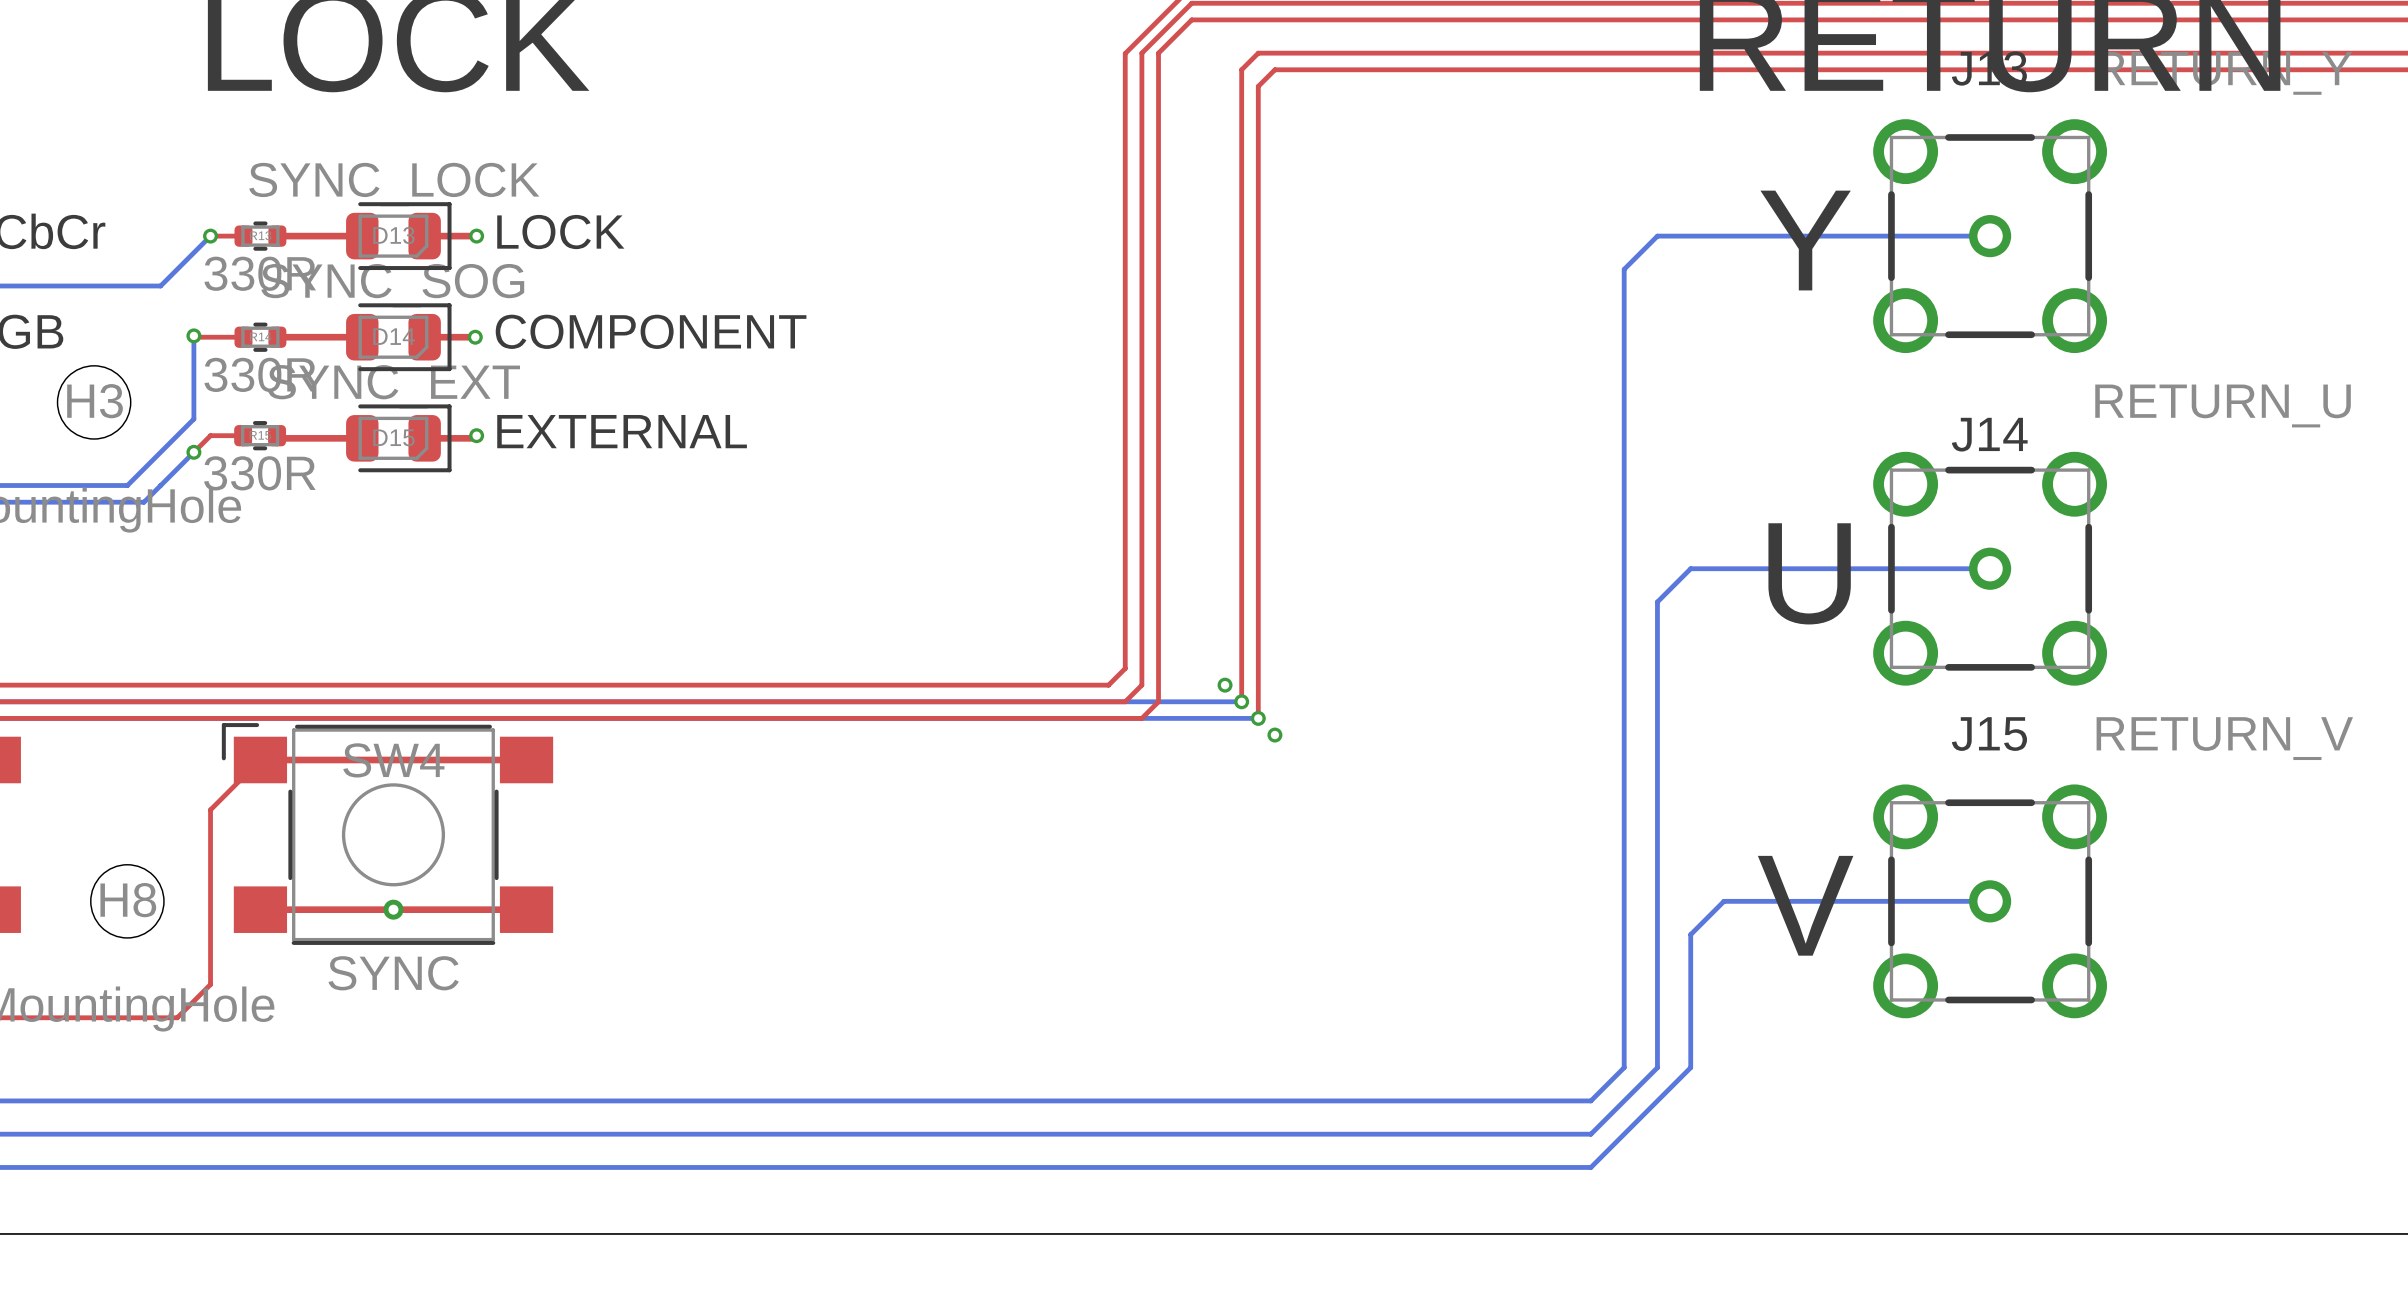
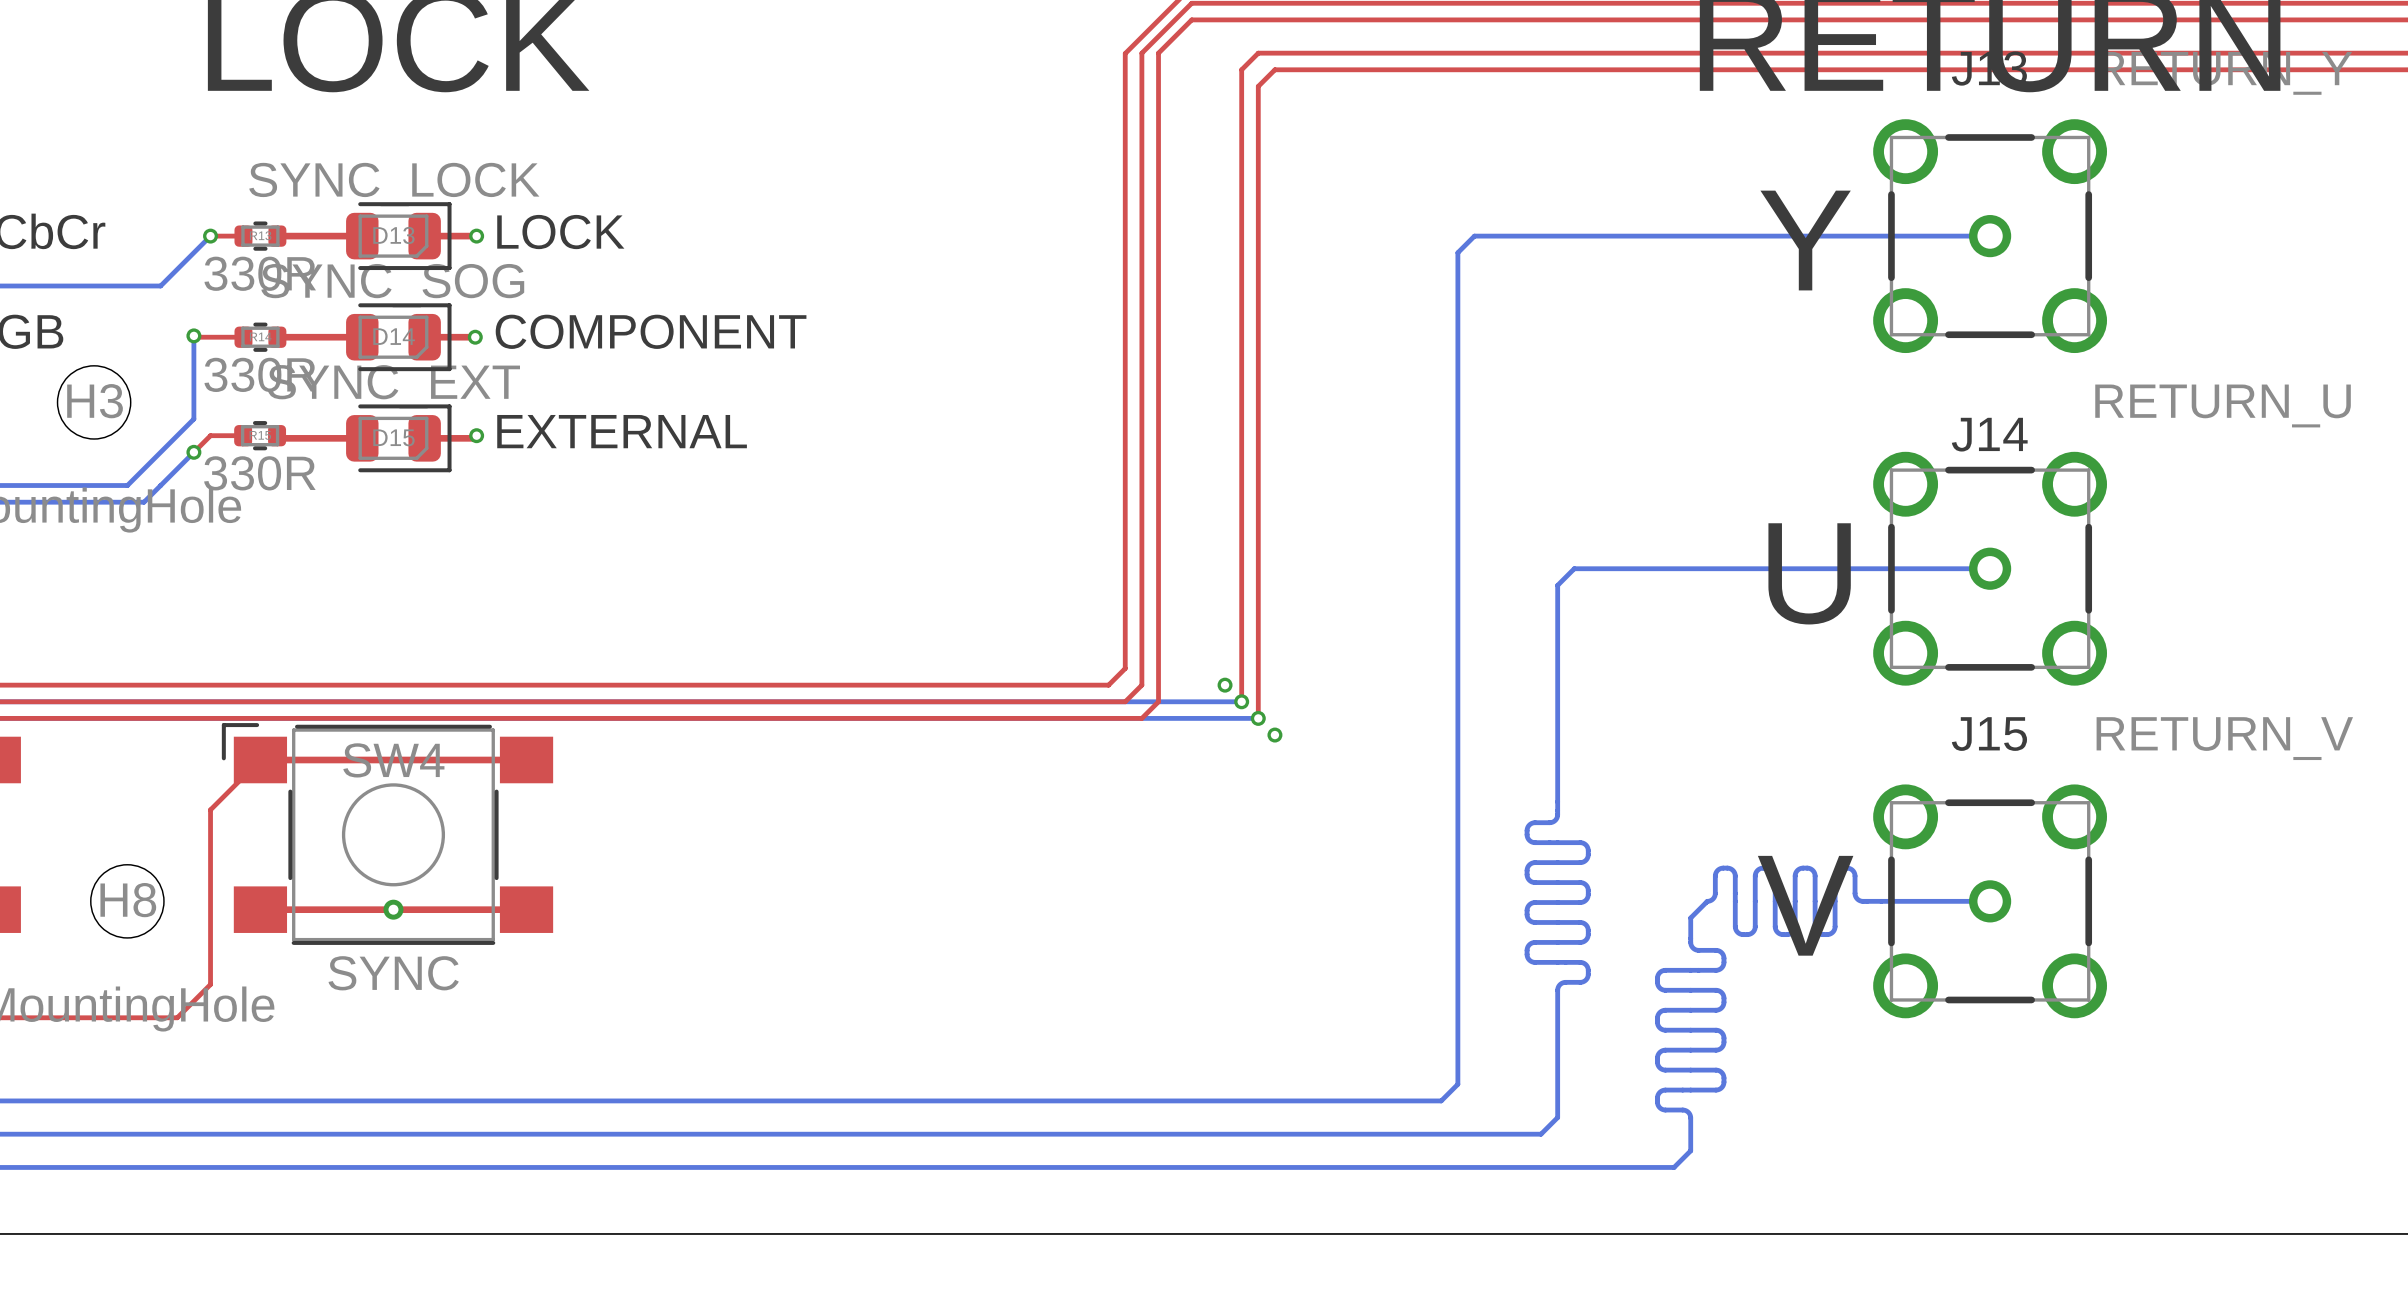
bottom track: (1657, 236) (1624, 269) (1624, 1067) (1590, 1100) (1441, 1100) -> (1657, 236) (1474, 236) (1457, 252) (1457, 1084) (1441, 1100)
bottom track: (1690, 568) (1657, 601) (1657, 978) -> (1690, 568) (1574, 568) (1557, 585) (1557, 815) (1552, 822) (1530, 823) (1527, 828) (1527, 835) (1529, 840) (1534, 842) (1582, 843) (1587, 847) (1588, 855) (1585, 860) (1581, 862) (1532, 863) (1527, 867) (1527, 875) (1529, 880) (1534, 882) (1582, 883) (1587, 887) (1588, 895) (1585, 900) (1581, 902) (1532, 902) (1527, 907) (1527, 915) (1529, 920) (1534, 922) (1582, 922) (1587, 927) (1588, 935) (1585, 940) (1581, 942) (1532, 942) (1527, 946) (1527, 955) (1529, 960) (1534, 962) (1582, 962) (1587, 966) (1588, 974) (1583, 981) (1563, 982) (1558, 987) (1557, 1117) (1541, 1134)
bottom track: (1863, 901) (1723, 901) (1690, 934) -> (1863, 901) (1855, 896) (1853, 871) (1847, 868) (1838, 869) (1835, 875) (1834, 929) (1829, 934) (1819, 933) (1815, 927) (1814, 873) (1809, 868) (1800, 868) (1795, 875) (1794, 929) (1789, 934) (1780, 934) (1775, 927) (1774, 873) (1769, 868) (1761, 868) (1755, 875) (1754, 929) (1749, 934) (1741, 934) (1735, 927) (1734, 873) (1729, 868) (1721, 868) (1715, 874) (1714, 897) (1707, 901) (1690, 917) (1690, 934)
bottom track: (1690, 942) (1690, 1067) (1590, 1167) -> (1690, 942) (1696, 949) (1720, 952) (1723, 957) (1722, 967) (1716, 970) (1664, 970) (1659, 972) (1657, 978)
bottom track: (1657, 982) (1657, 1018) -> (1657, 982) (1659, 987) (1663, 990) (1716, 990) (1722, 993) (1723, 998) (1723, 1005) (1718, 1009) (1664, 1010) (1659, 1012) (1657, 1018)
bottom track: (1657, 1022) (1657, 1058) -> (1657, 1022) (1659, 1027) (1663, 1029) (1716, 1030) (1722, 1033) (1723, 1038) (1723, 1045) (1718, 1049) (1664, 1050) (1659, 1052) (1657, 1058)
bottom track: (1657, 1062) (1657, 1067) (1590, 1134) (1541, 1134) -> (1657, 1062) (1659, 1067) (1663, 1069) (1716, 1070) (1723, 1075) (1723, 1084) (1718, 1089) (1664, 1090) (1658, 1094) (1657, 1103) (1661, 1108) (1684, 1110) (1689, 1113) (1690, 1150) (1674, 1167) (1590, 1167)

